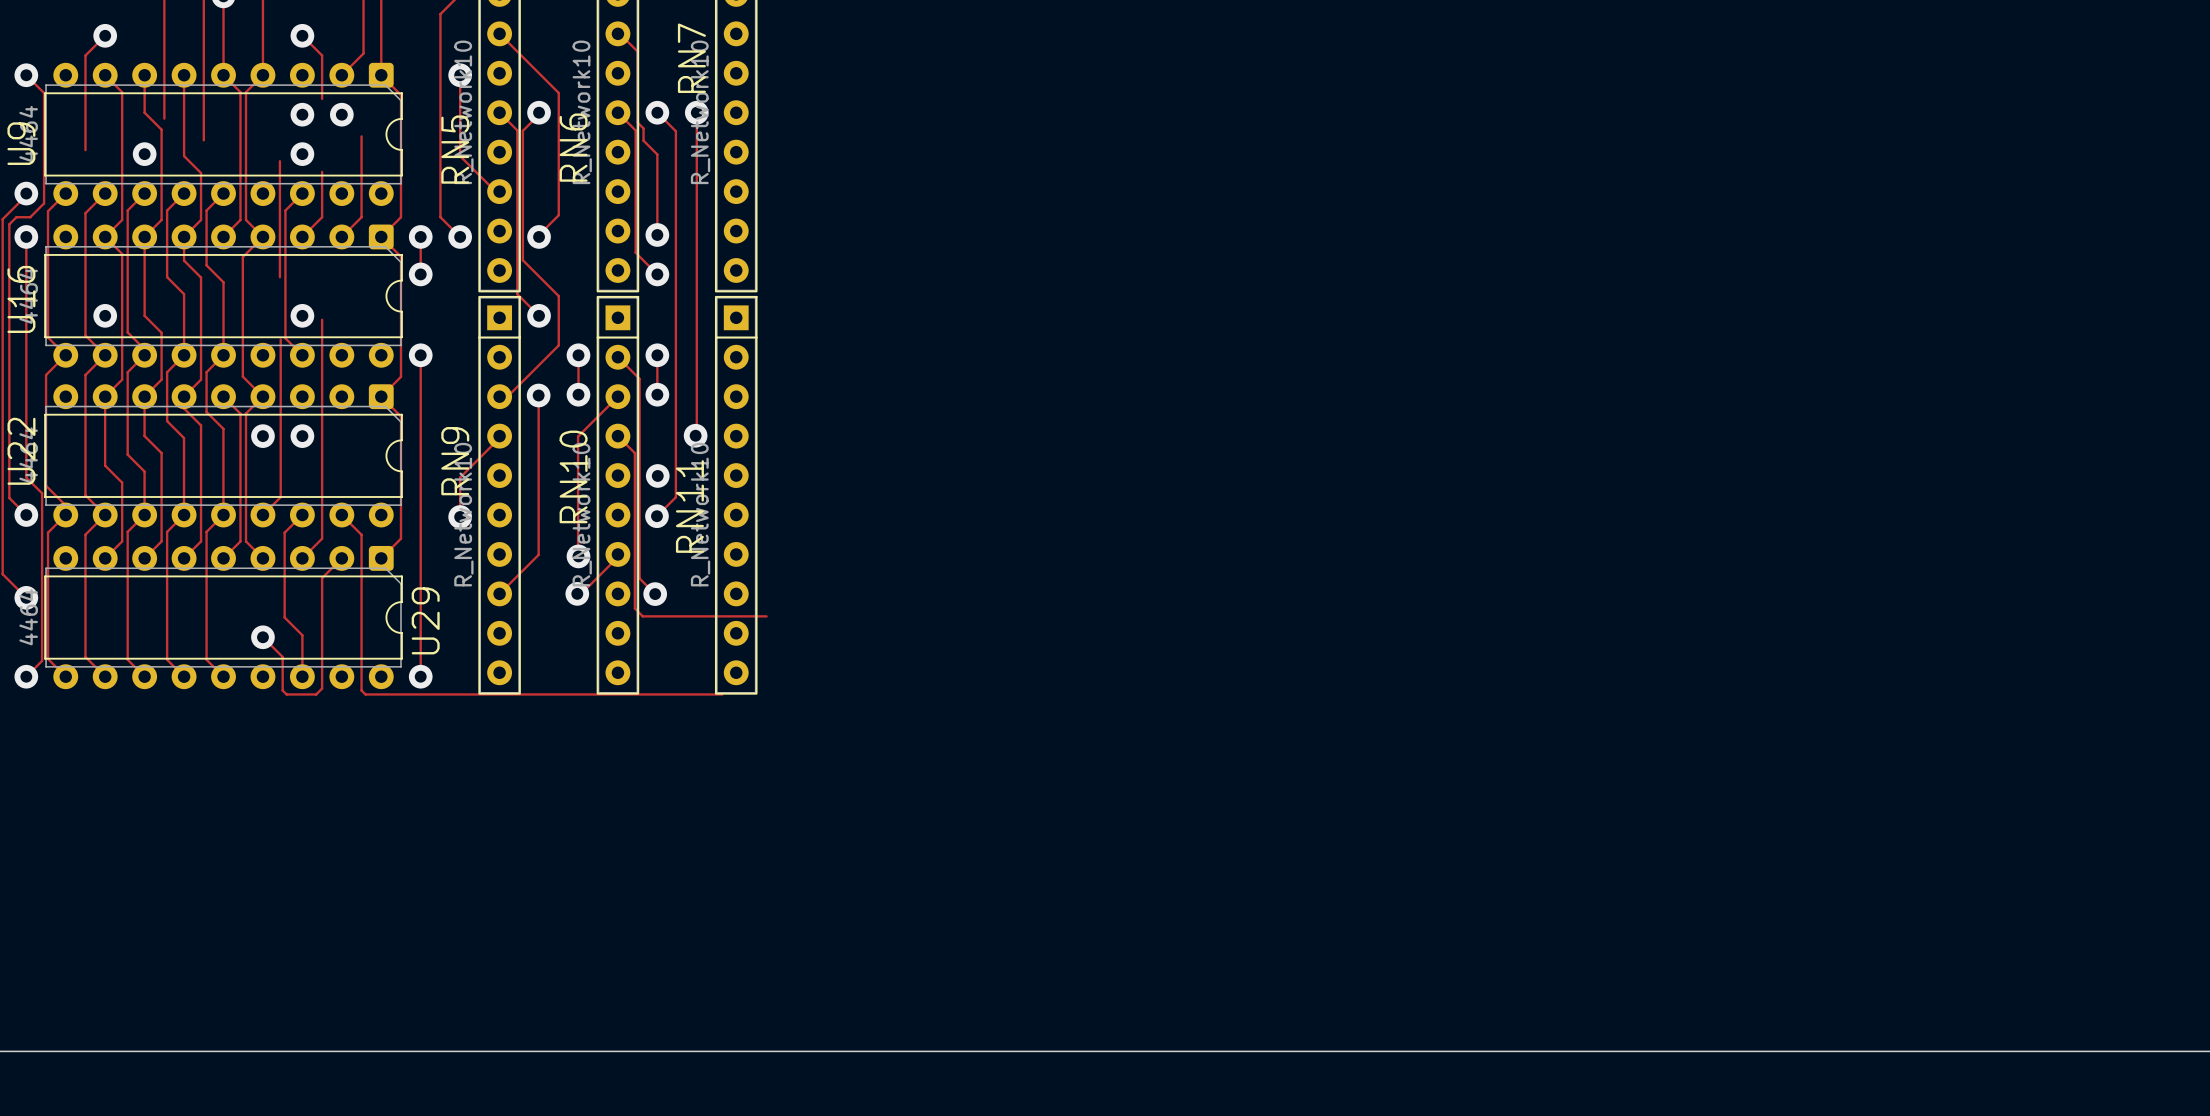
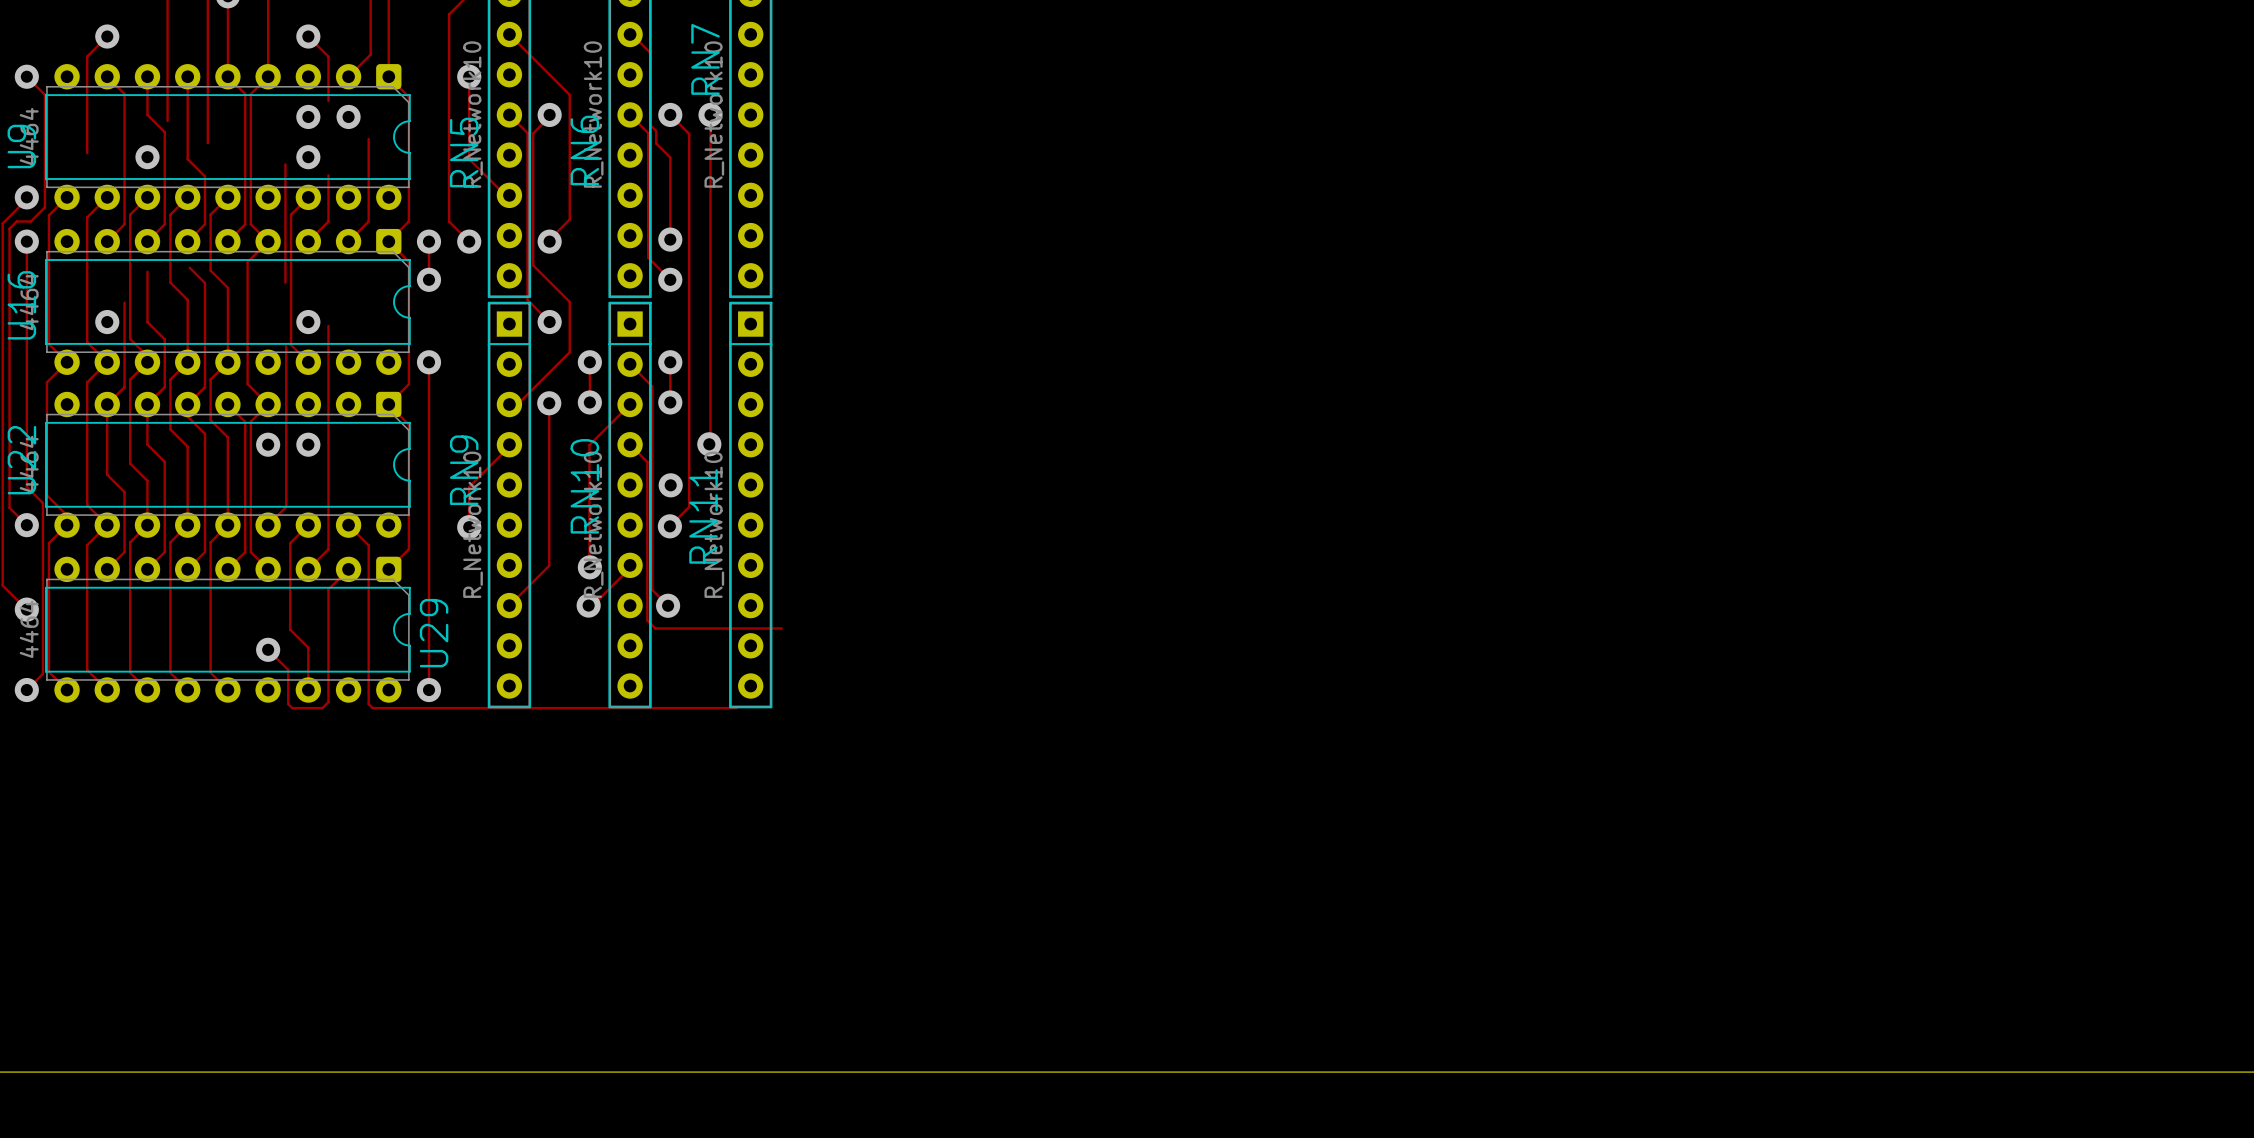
track: (105, 236) (122, 253) (122, 296) -> none
track: (144, 236) (144, 266) -> none
track: (184, 236) (184, 260) (186, 262) -> none

